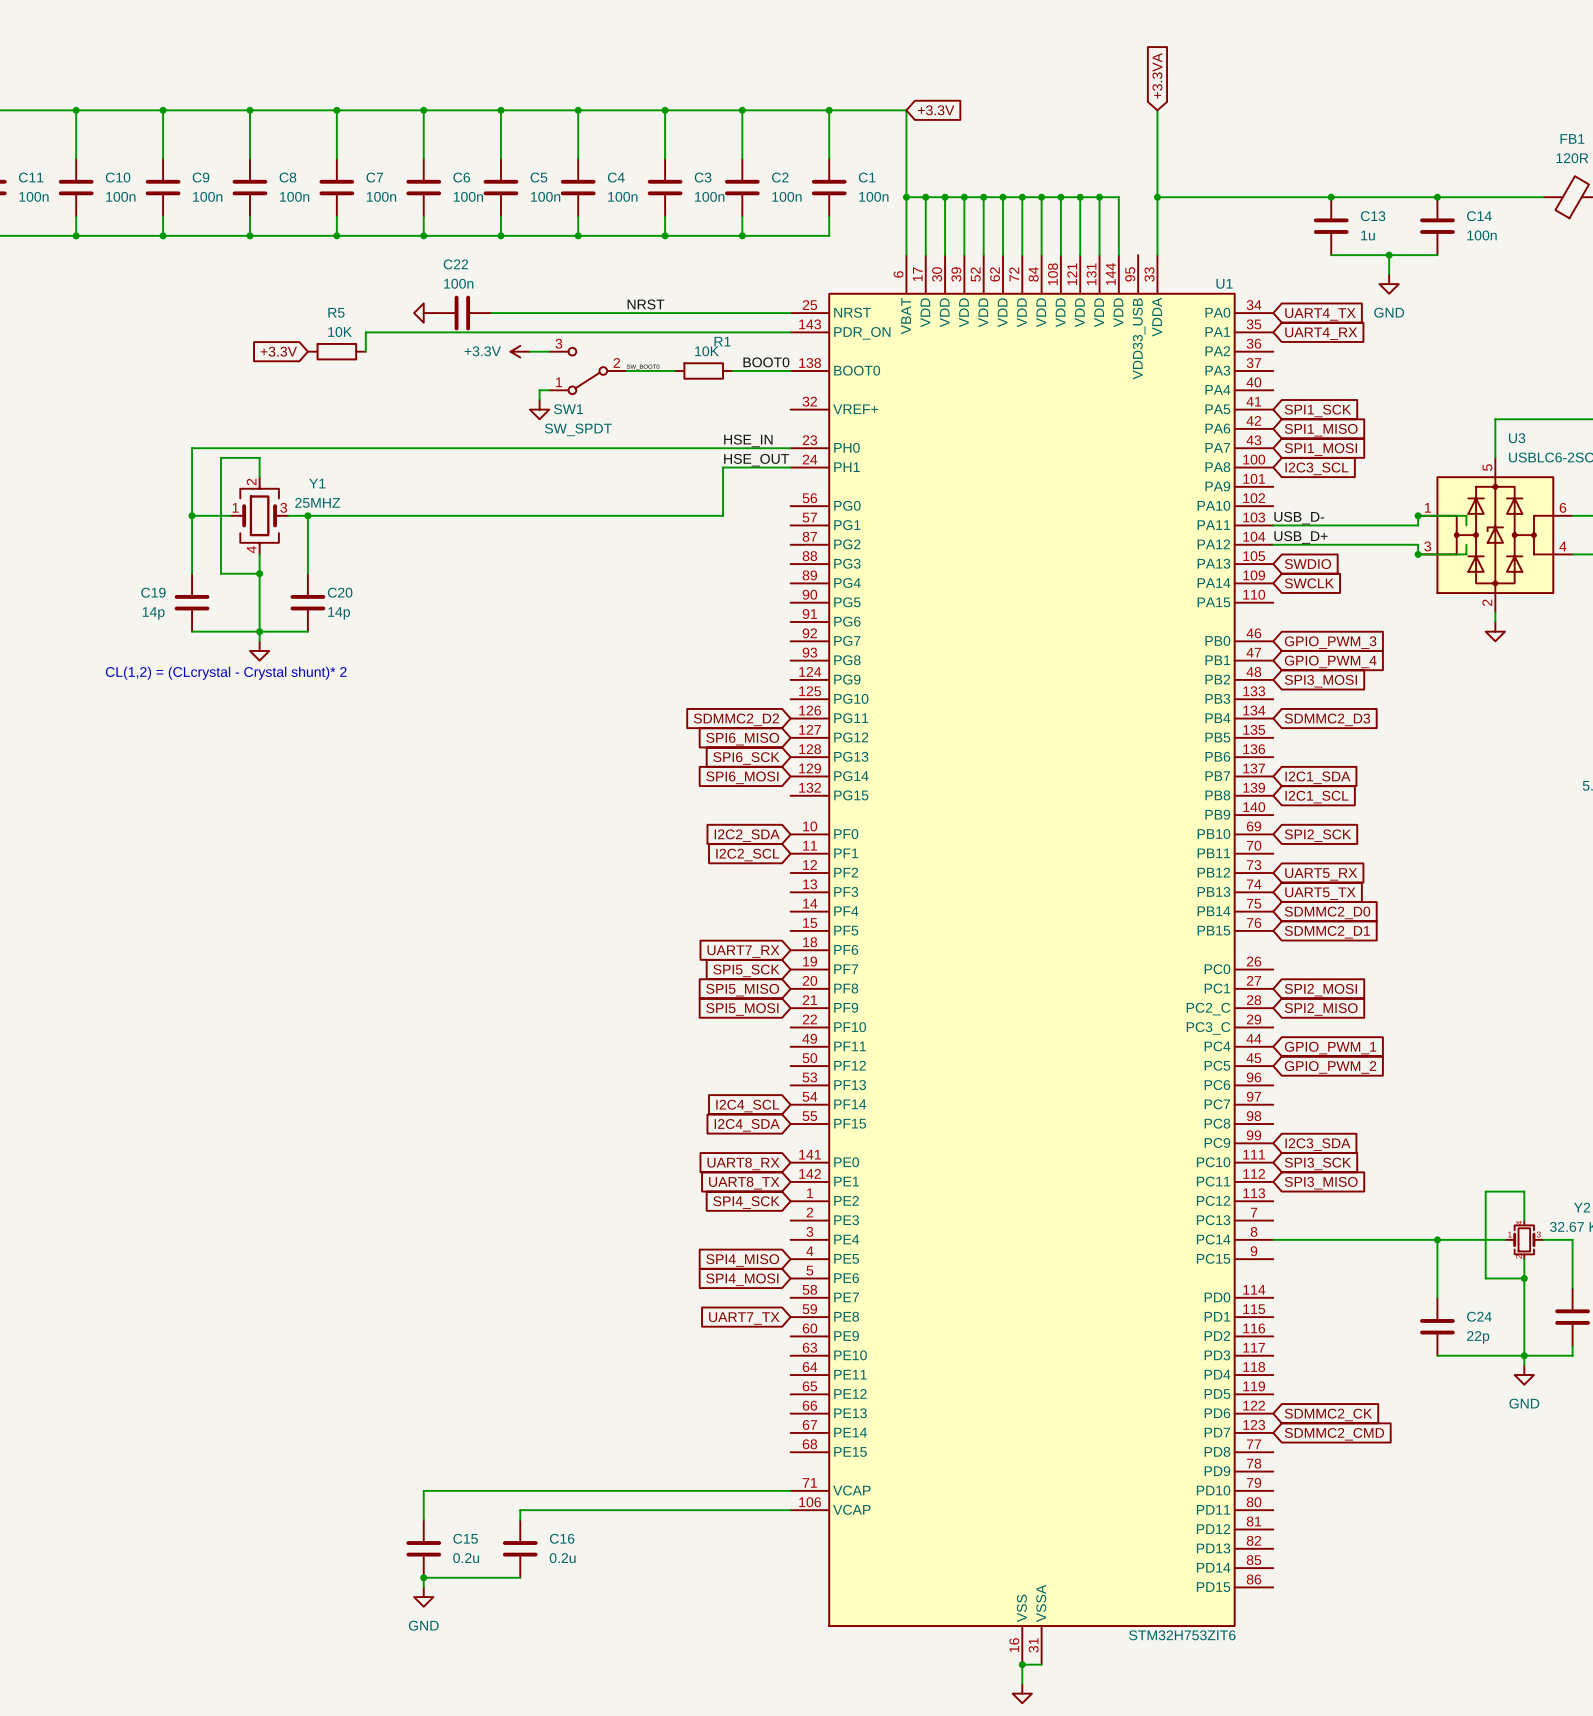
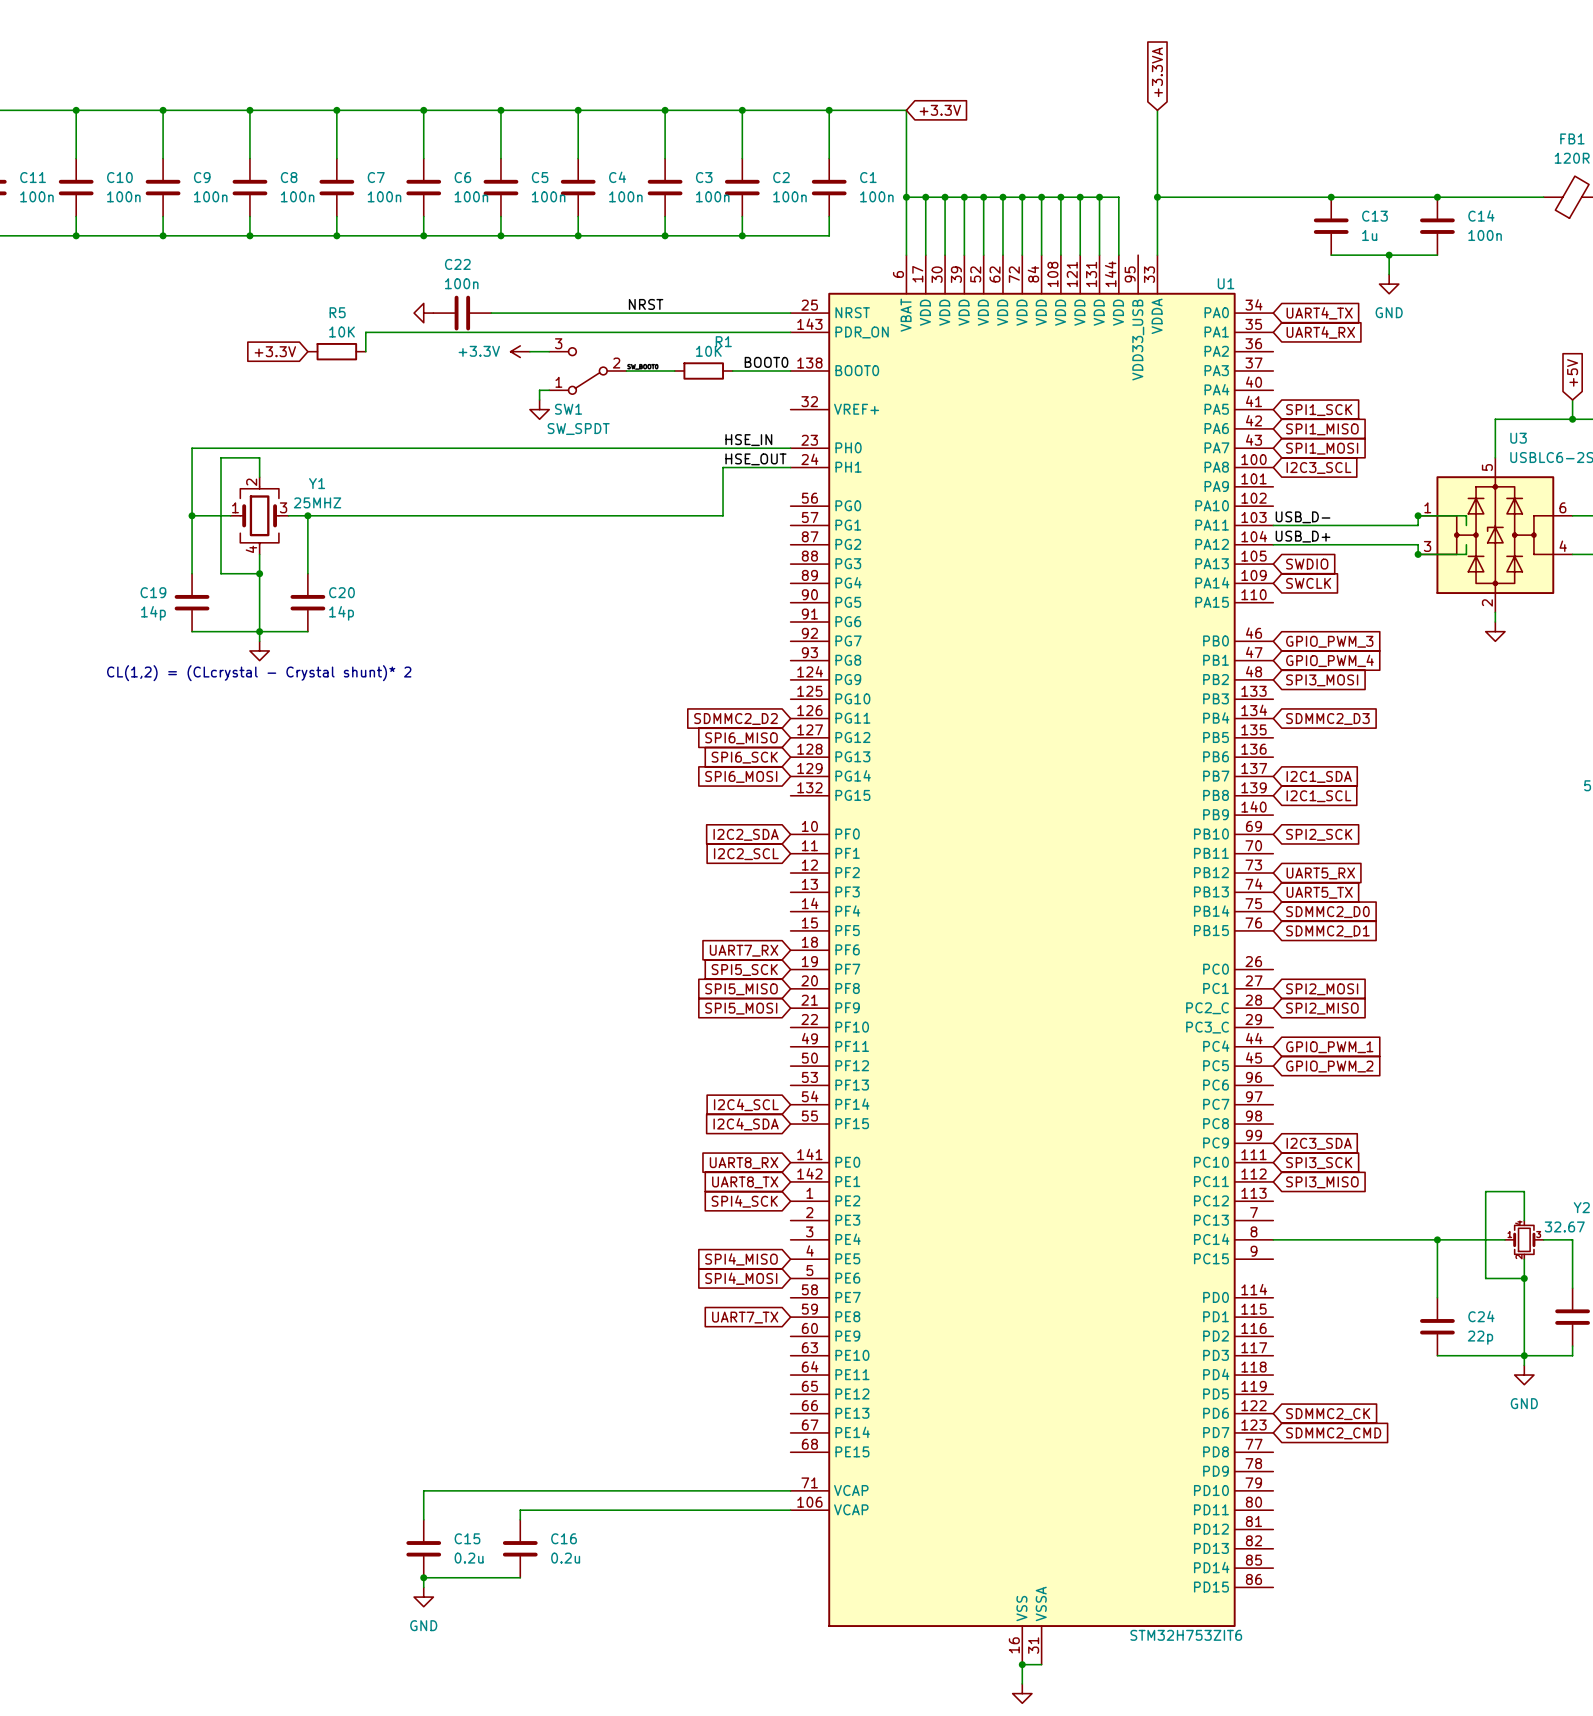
global label: none -> +5V (1572, 372)
wire: none -> (1572, 399) (1572, 419)
junction: none -> (1572, 419)

